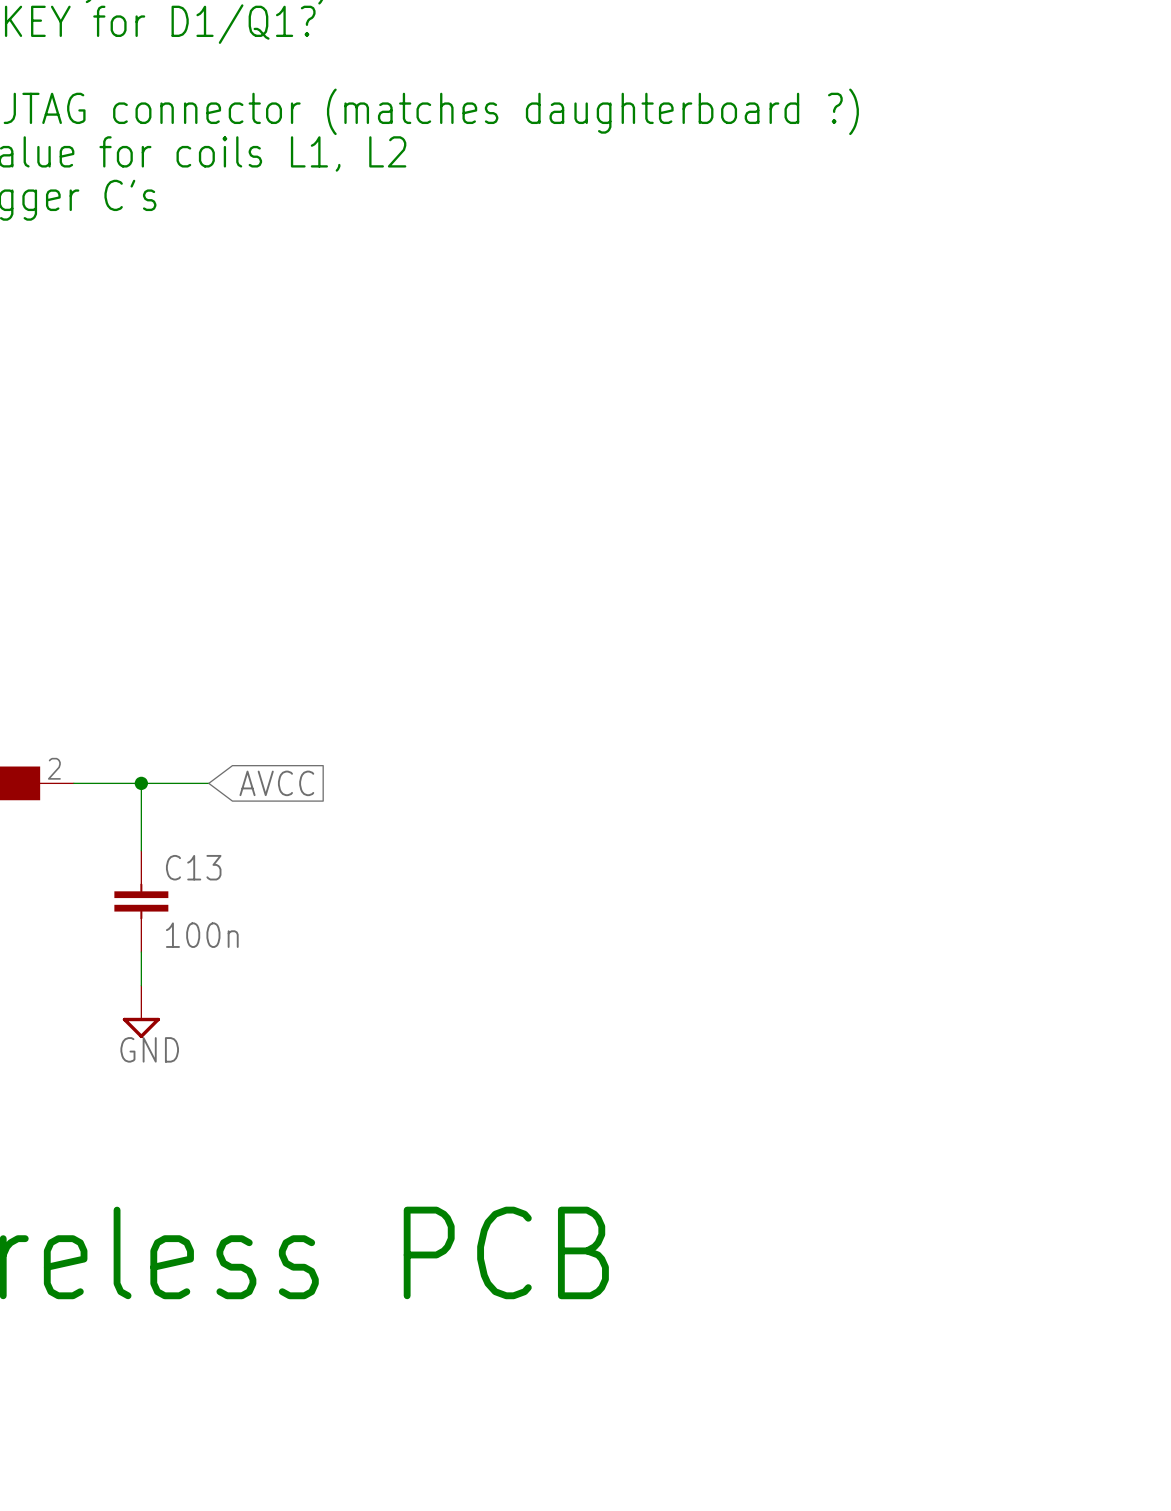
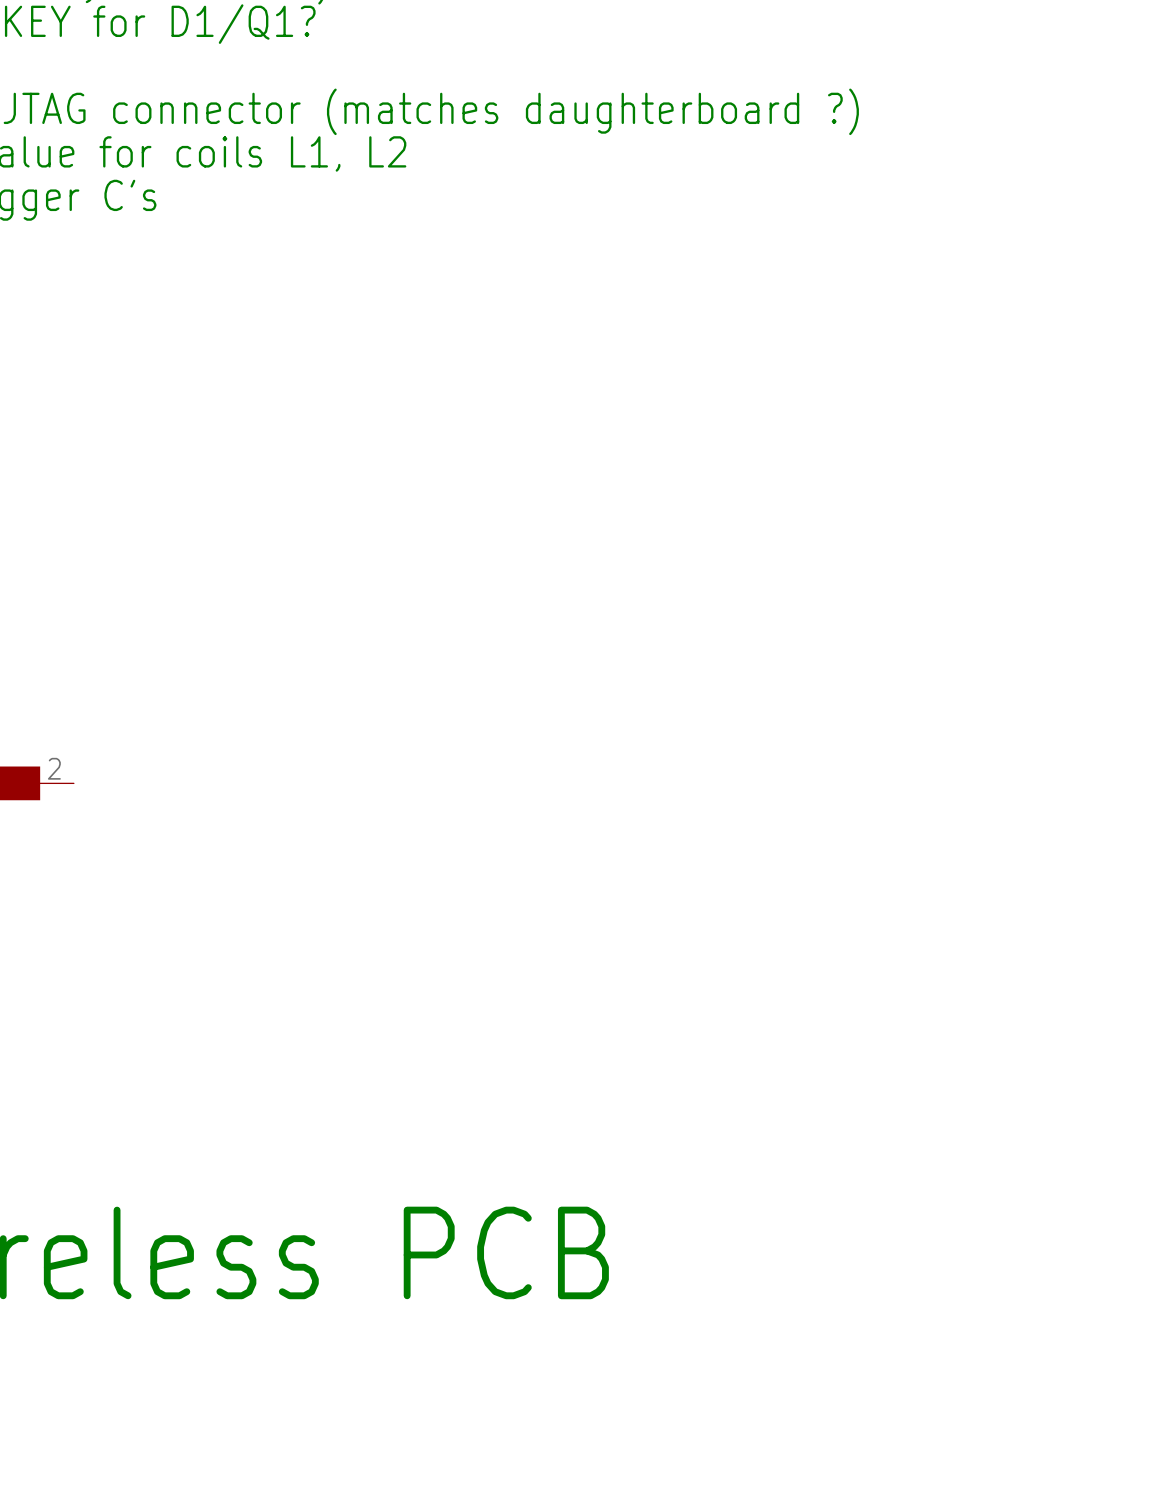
wire: (73, 783) (208, 783) -> none
wire: (141, 783) (141, 850) -> none
junction: (141, 783) -> none
global label: AVCC (276, 783) -> none
C13: 100n (141, 901) -> none
wire: (141, 952) (141, 985) -> none
power symbol: GND (141, 1011) -> none

